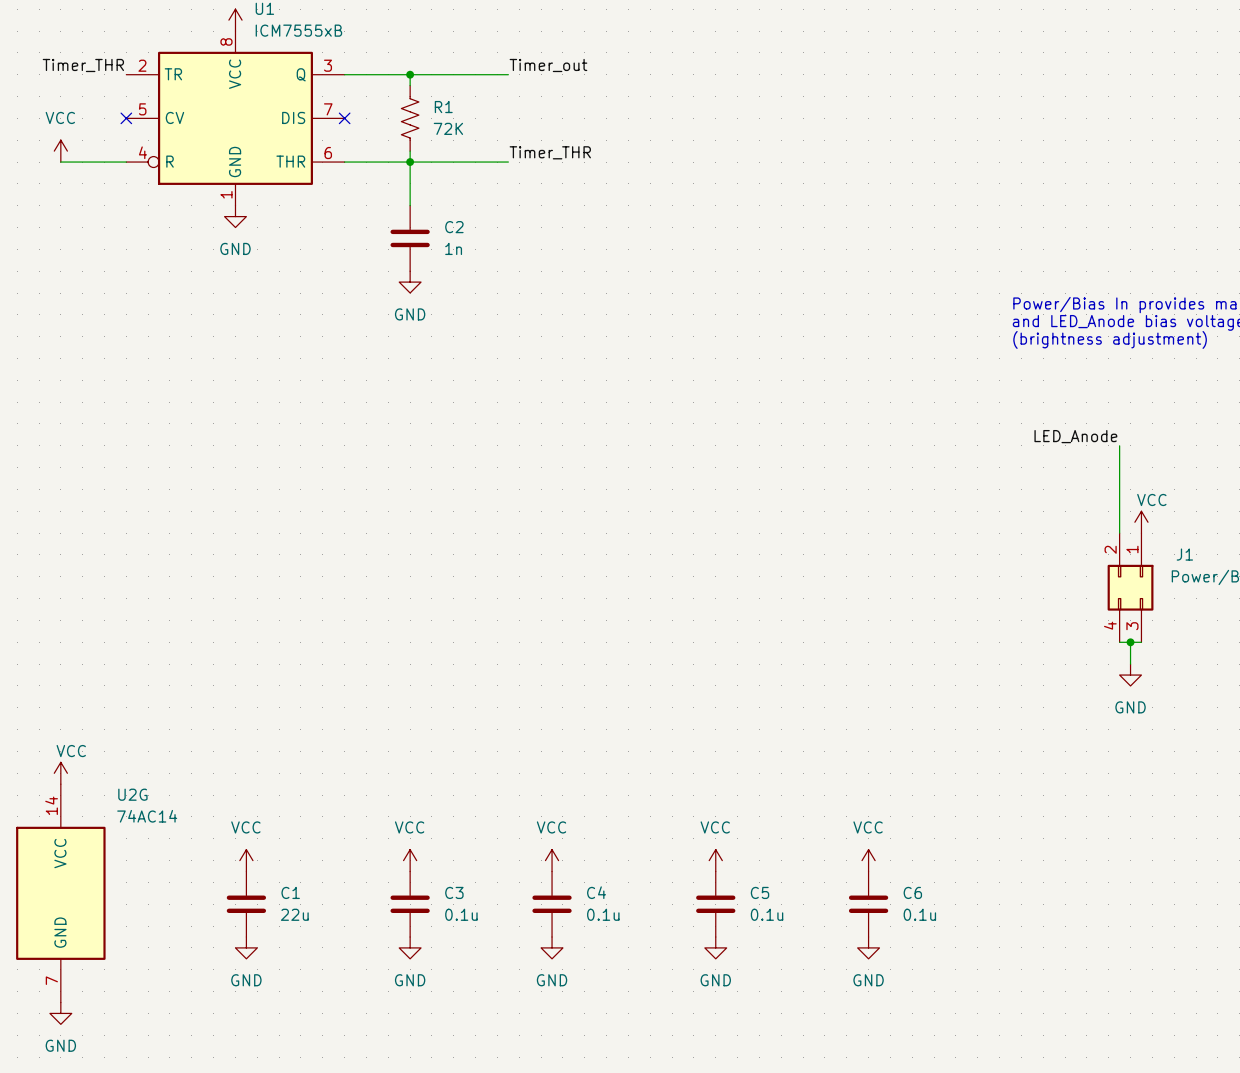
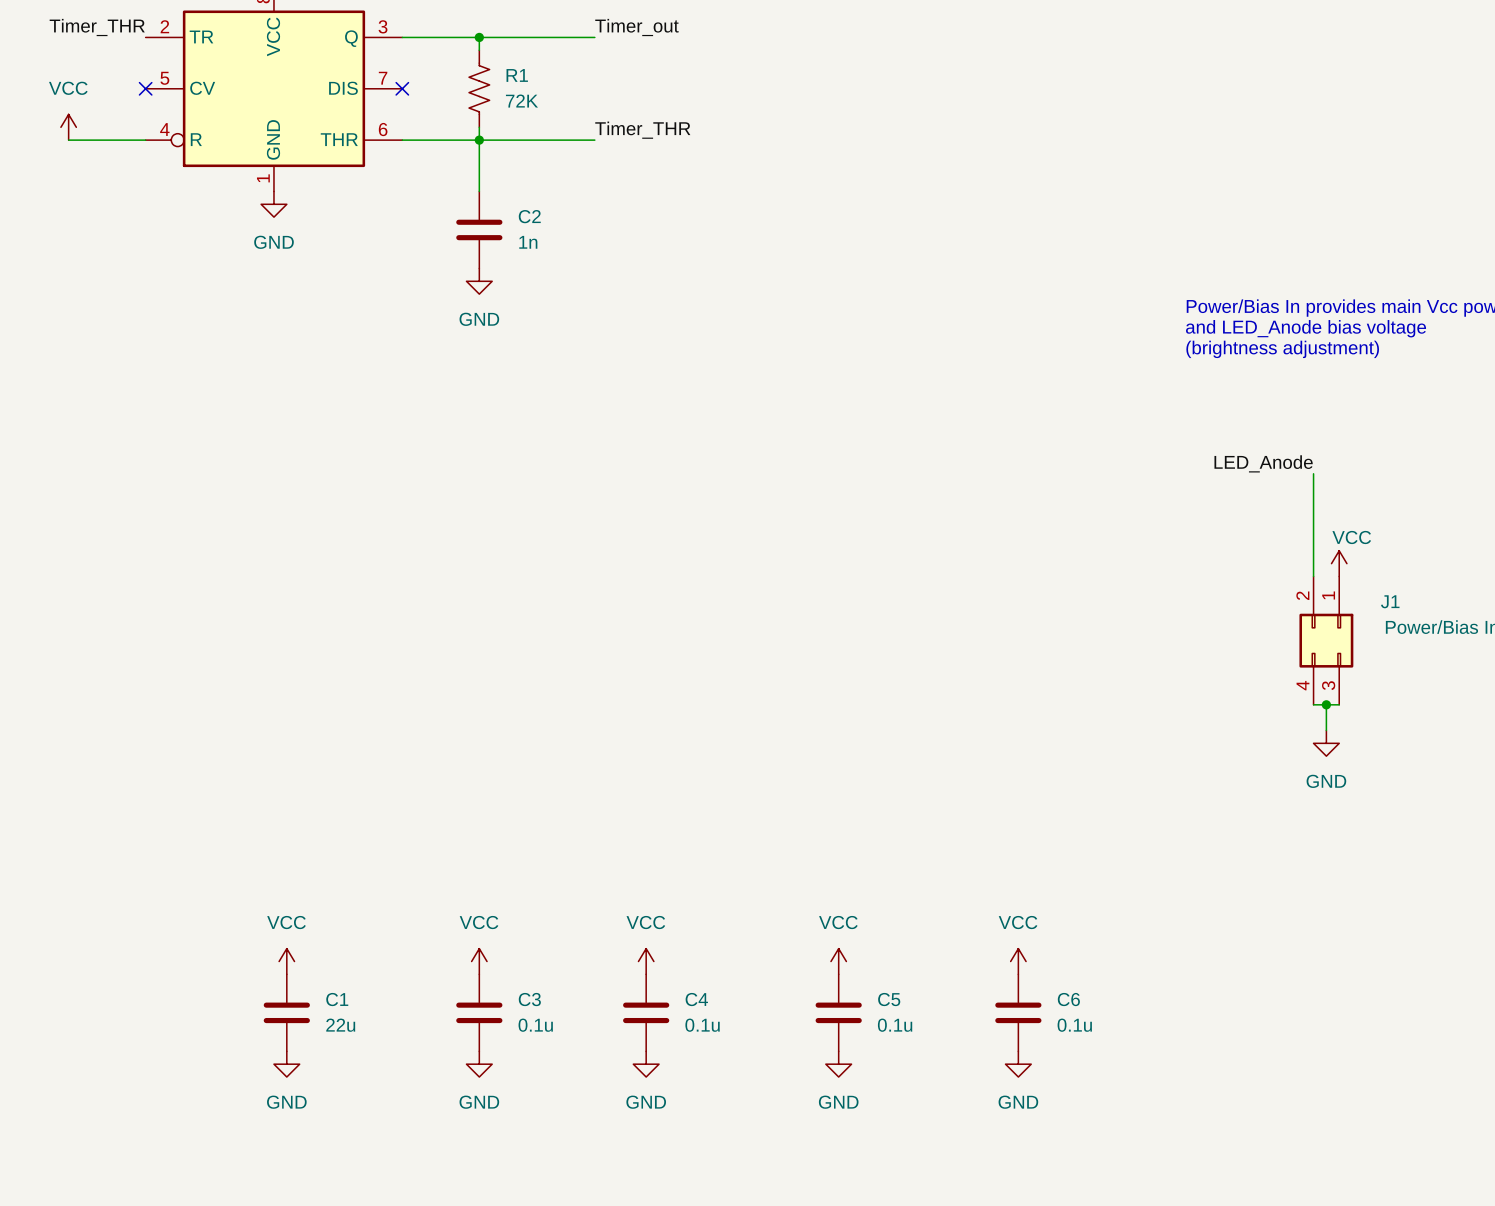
power symbol: VCC (60, 773) -> none
U2G: 74AC14 (60, 893) -> none
power symbol: GND (60, 1013) -> none

